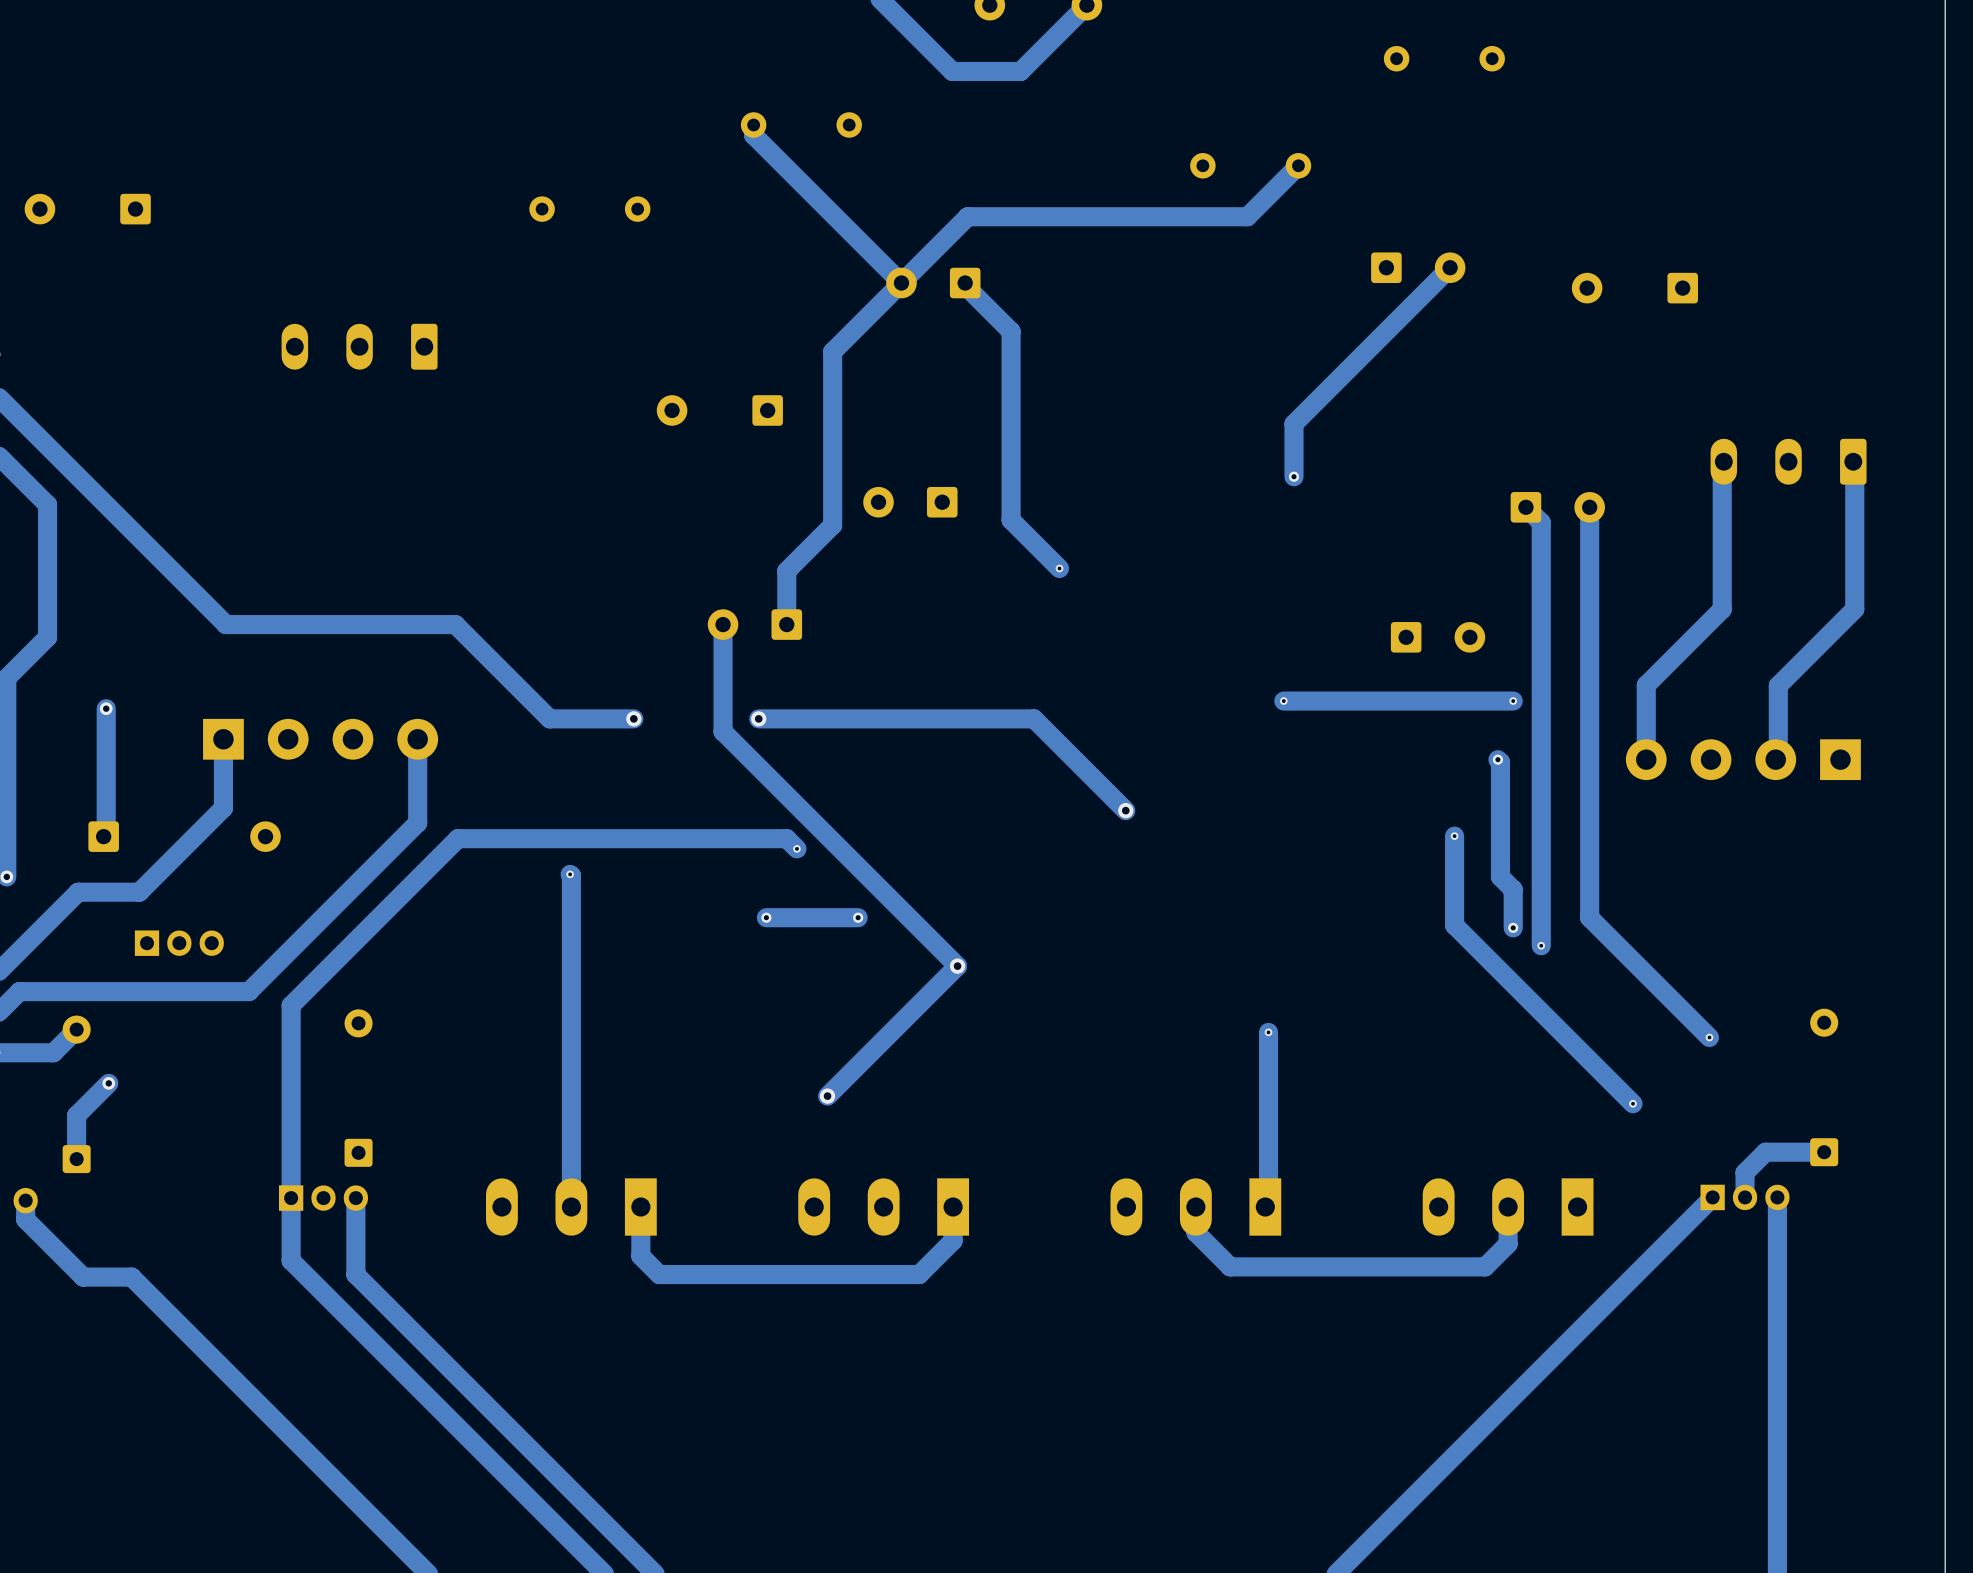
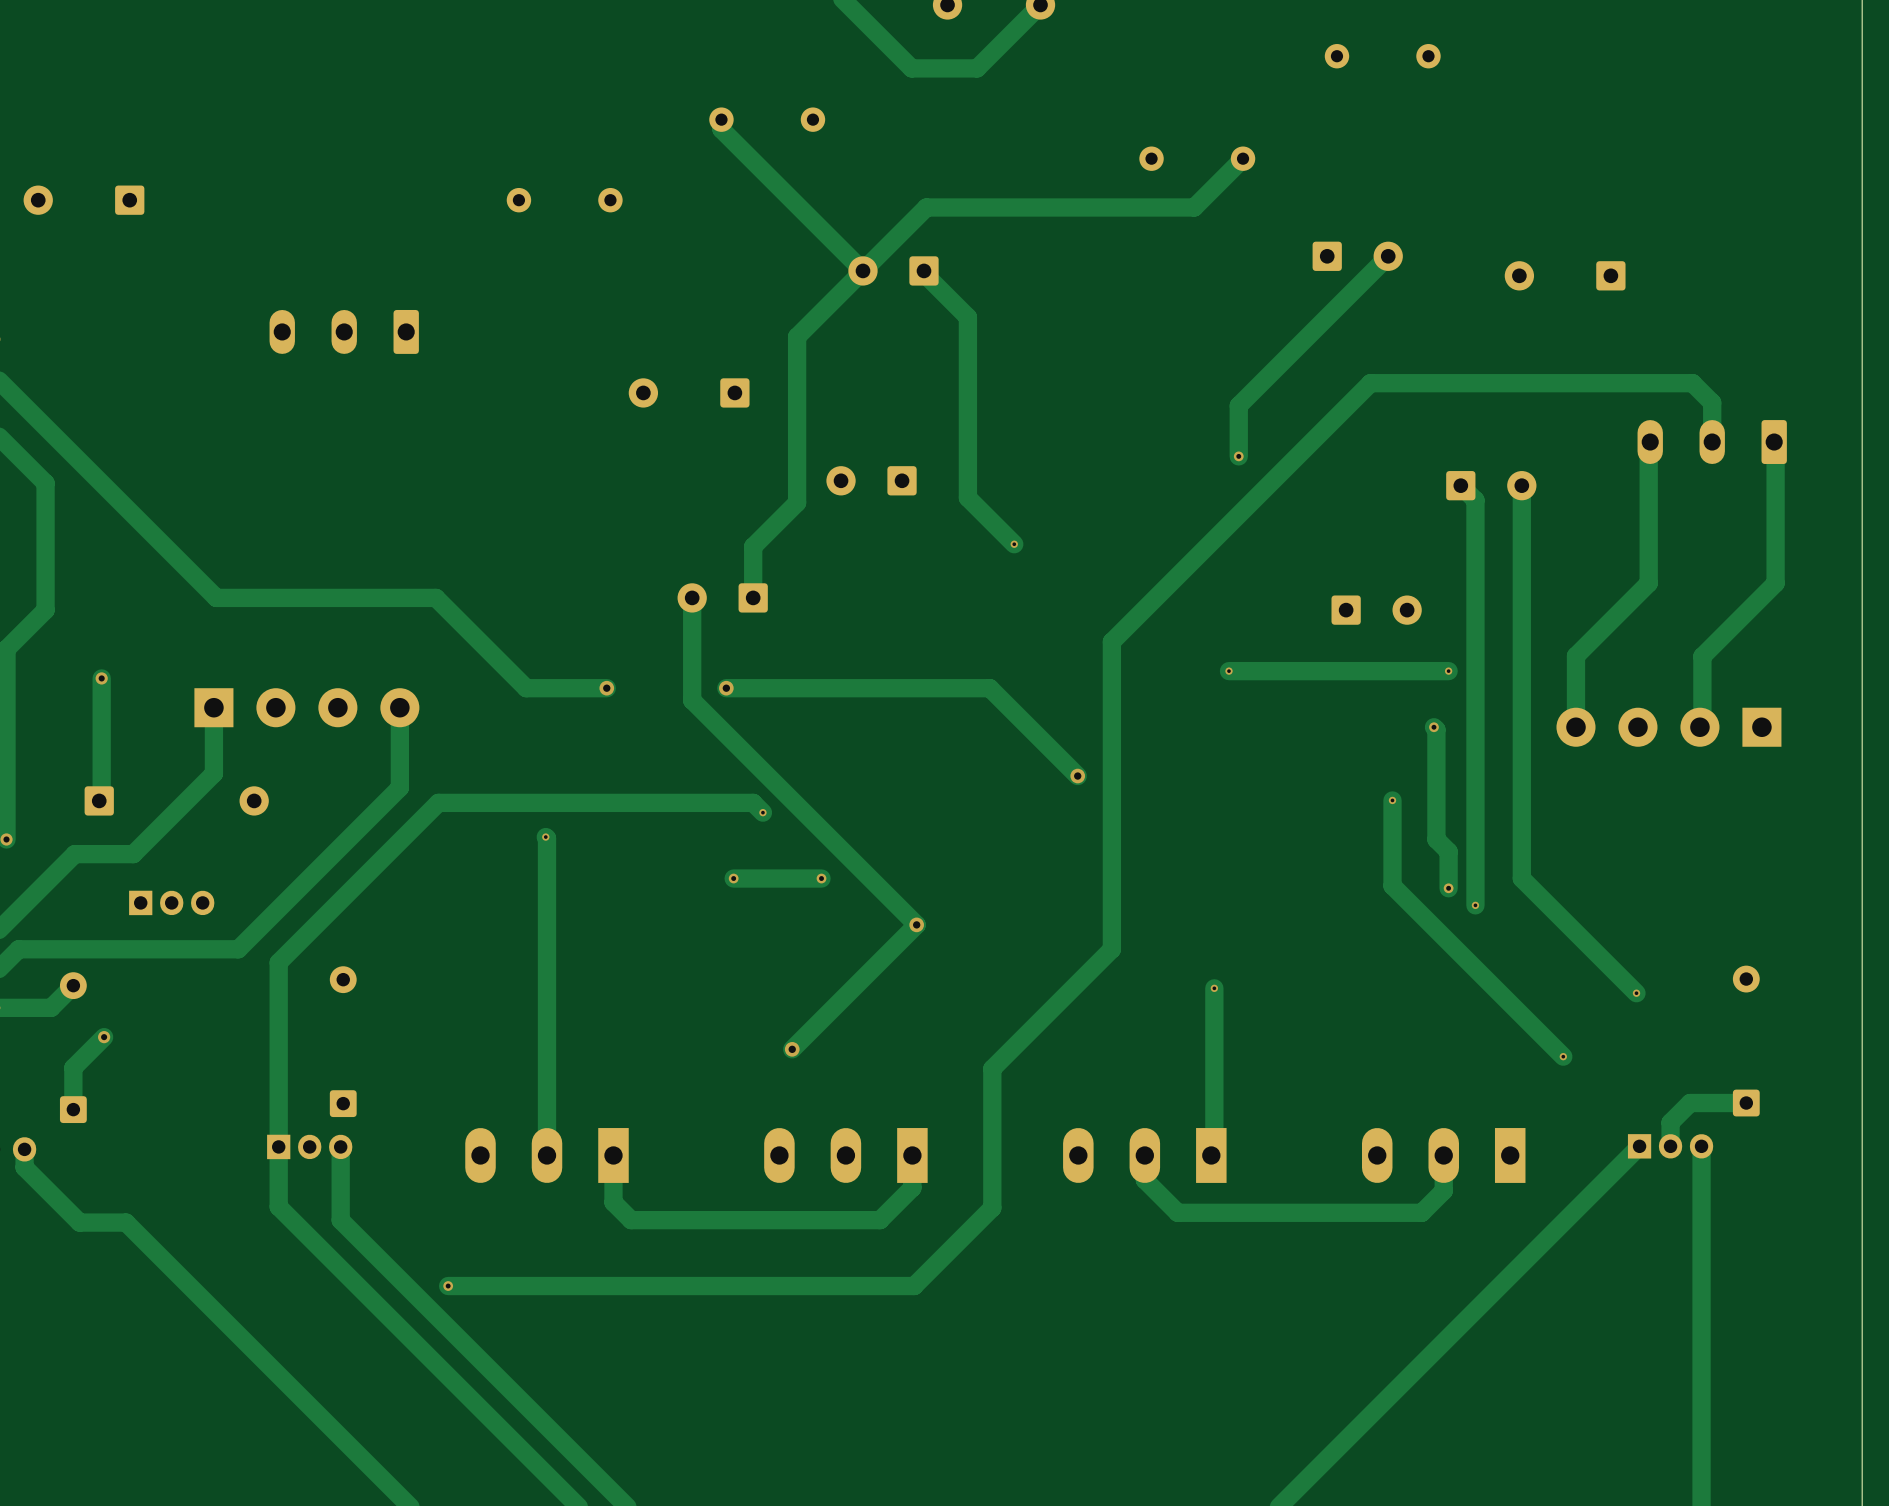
track: none -> (1712, 442) (1712, 402) (1692, 383) (1370, 383) (1111, 641) (1111, 949) (992, 1068) (992, 1207) (914, 1286) (448, 1286)
via: none -> (448, 1286)

